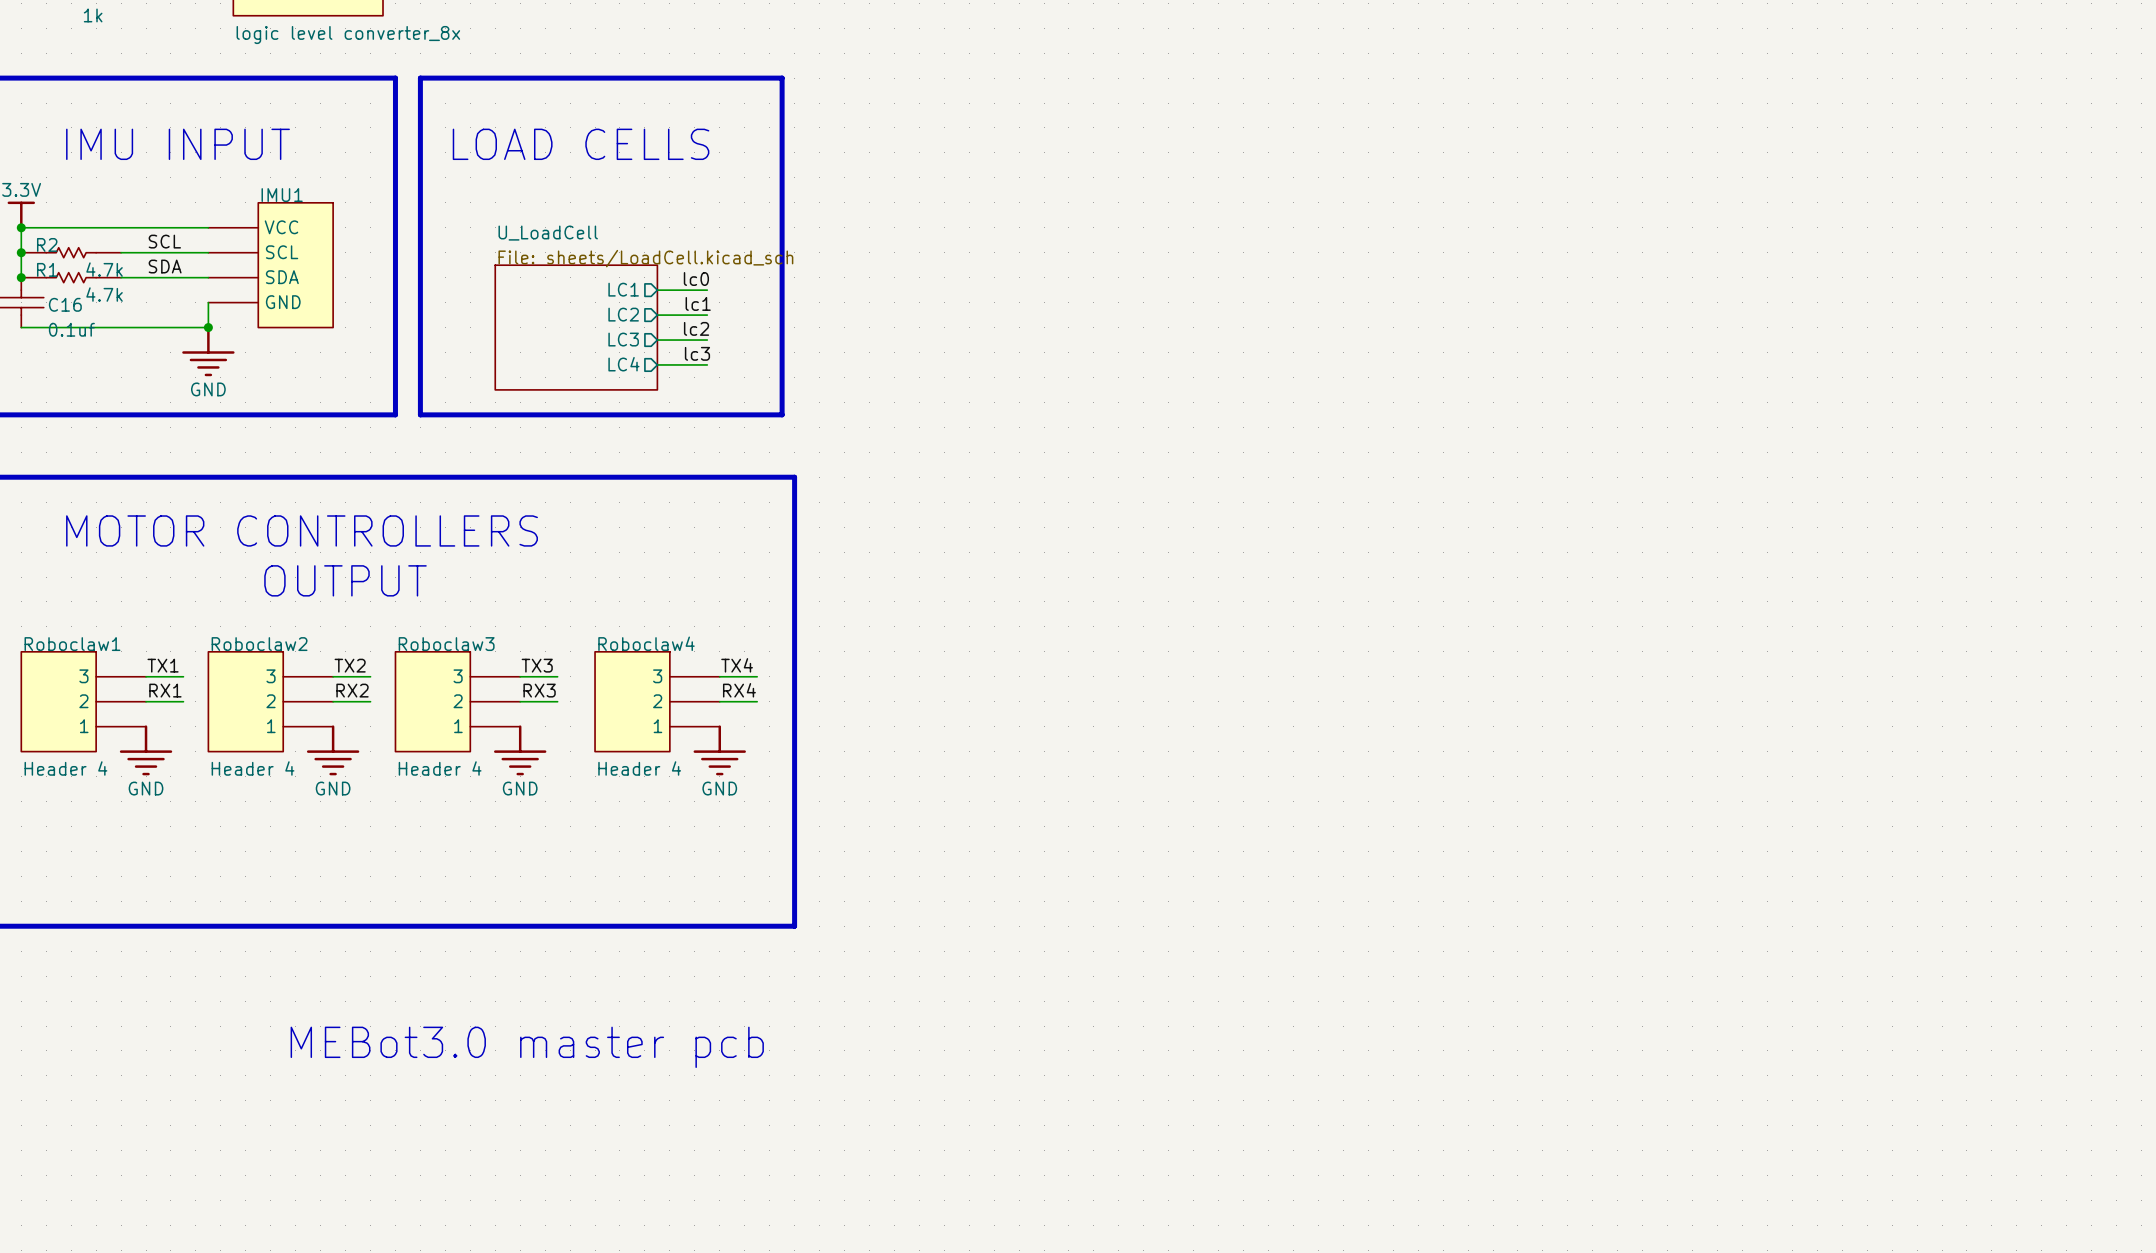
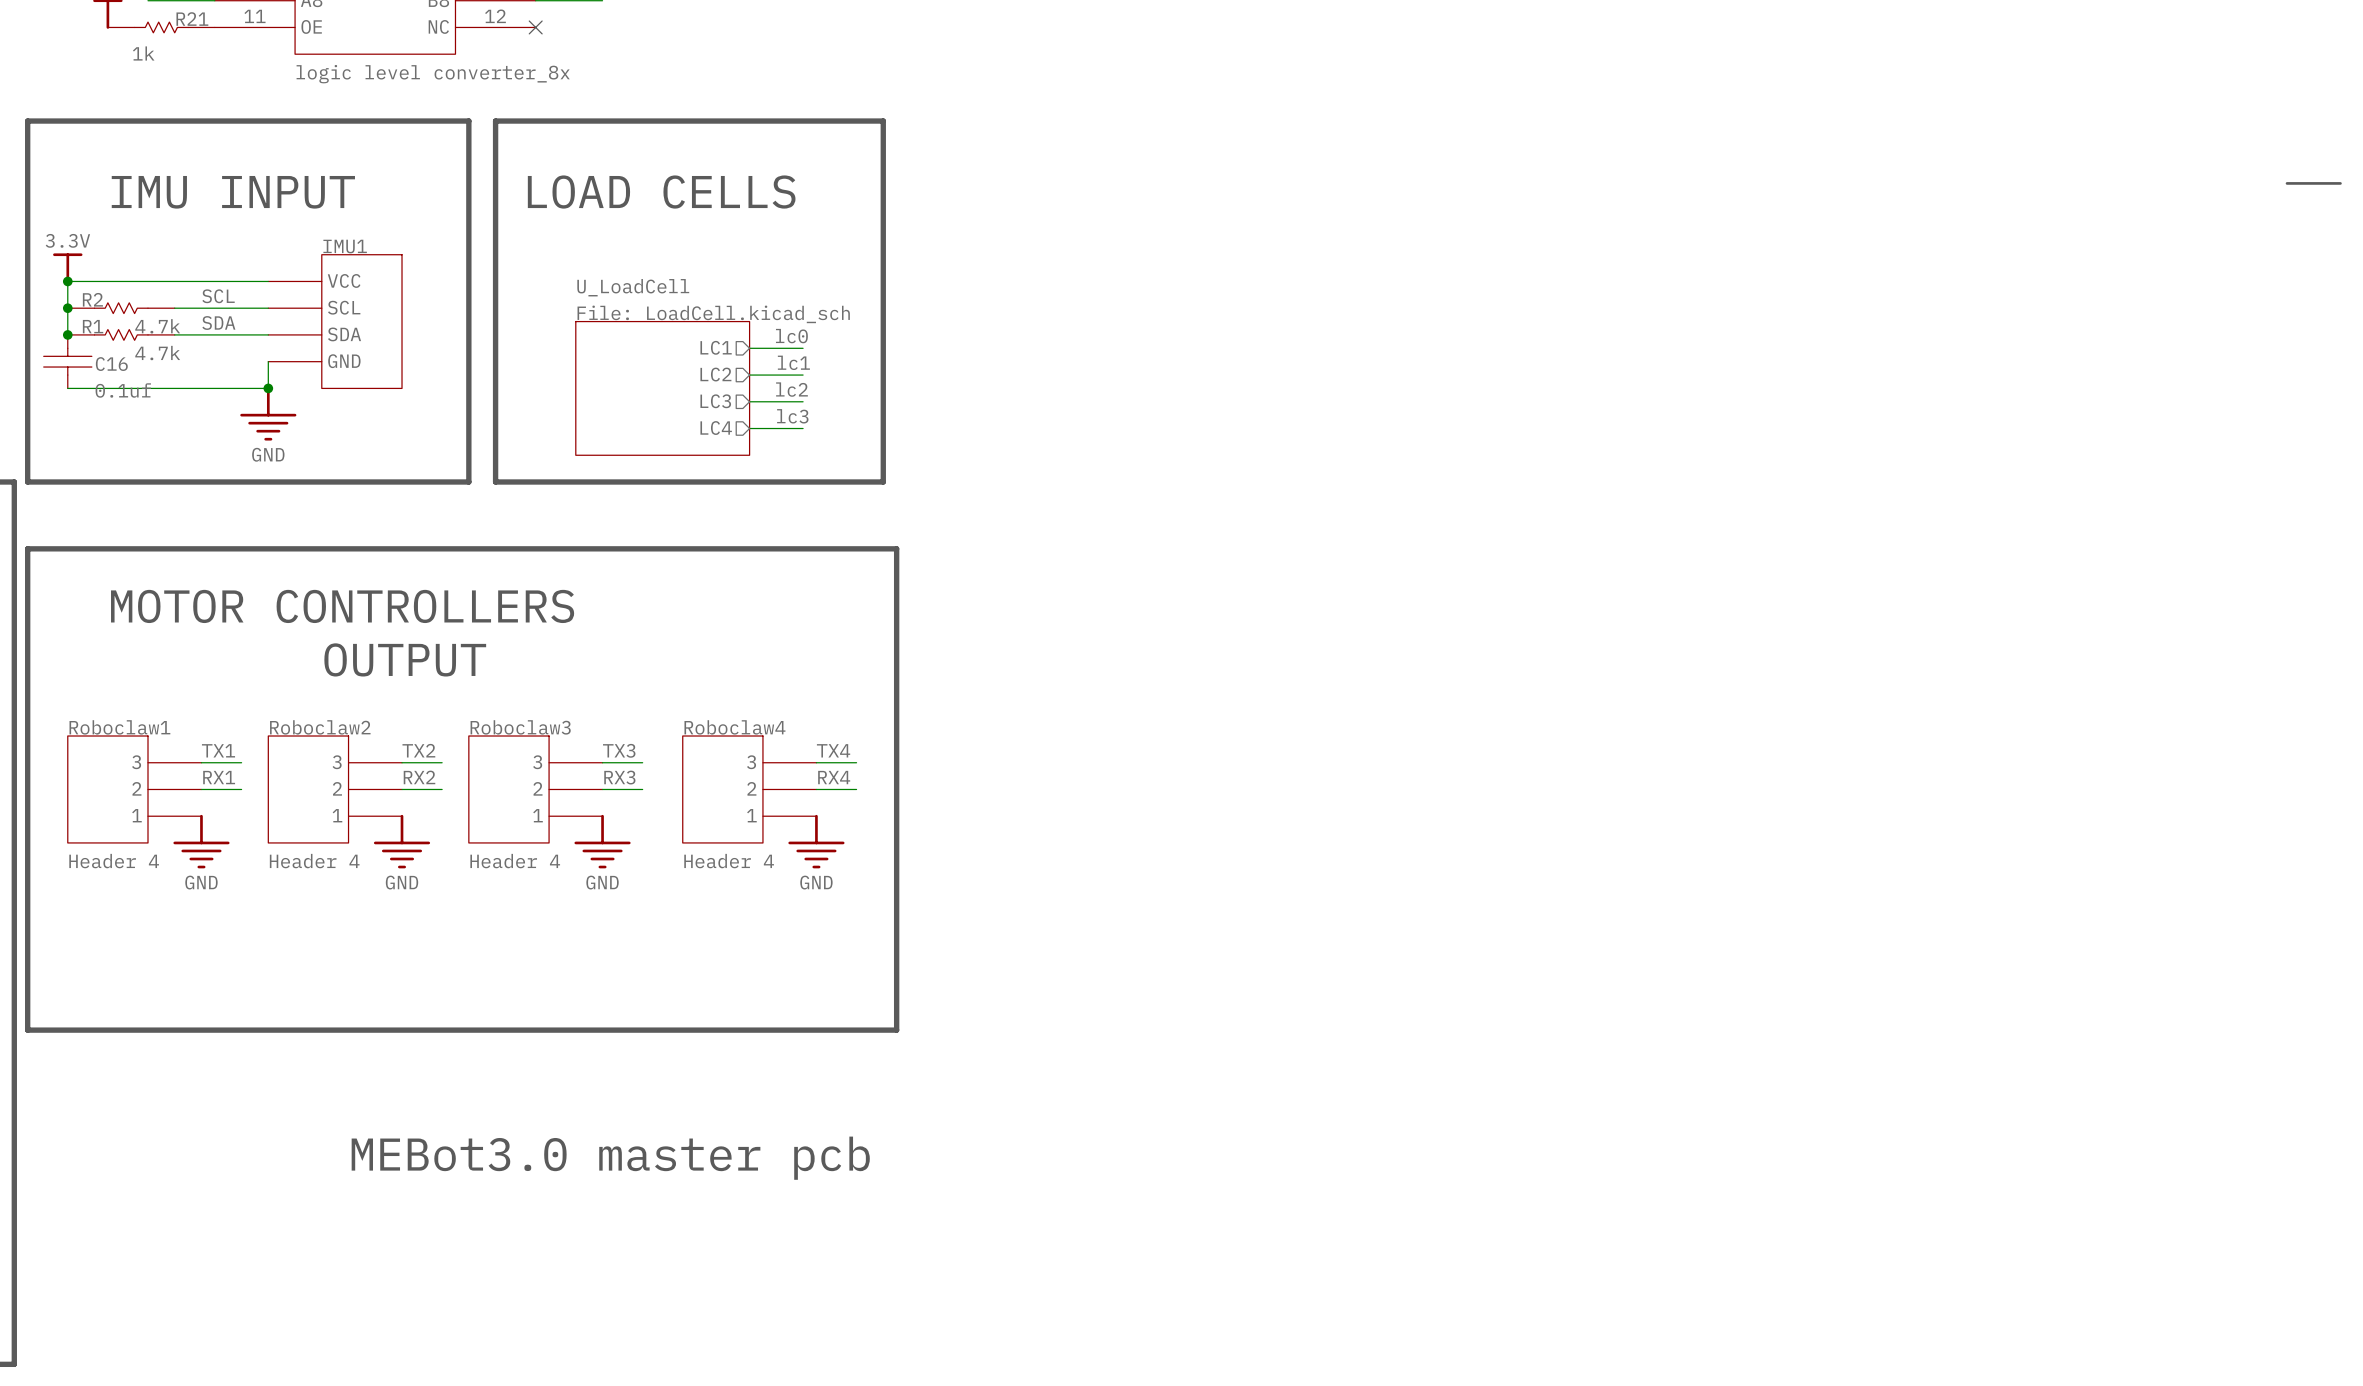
line: none -> (2287, 183) (2340, 183)
sheet U_LoadCell value: File: sheets/LoadCell.kicad_sch (645, 258) -> File: LoadCell.kicad_sch (713, 314)

